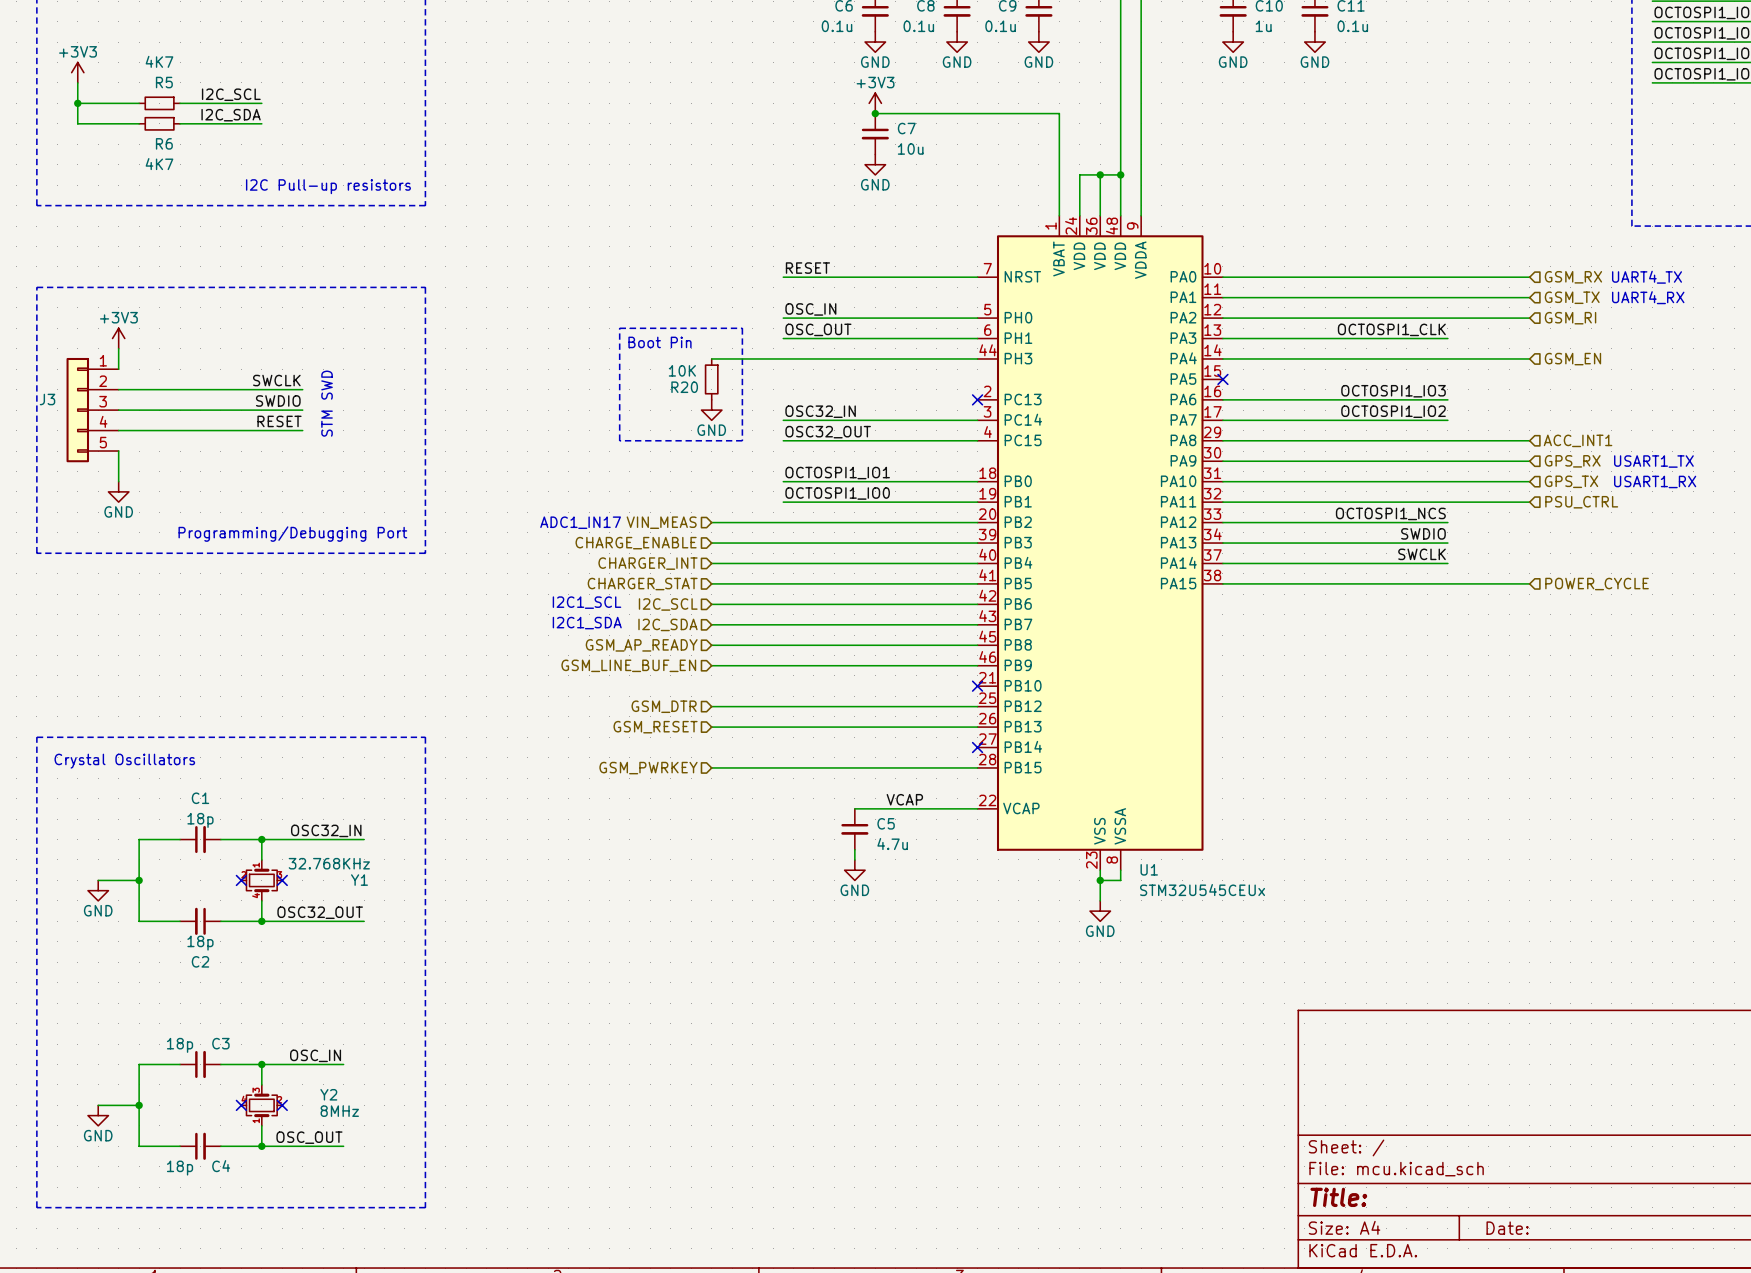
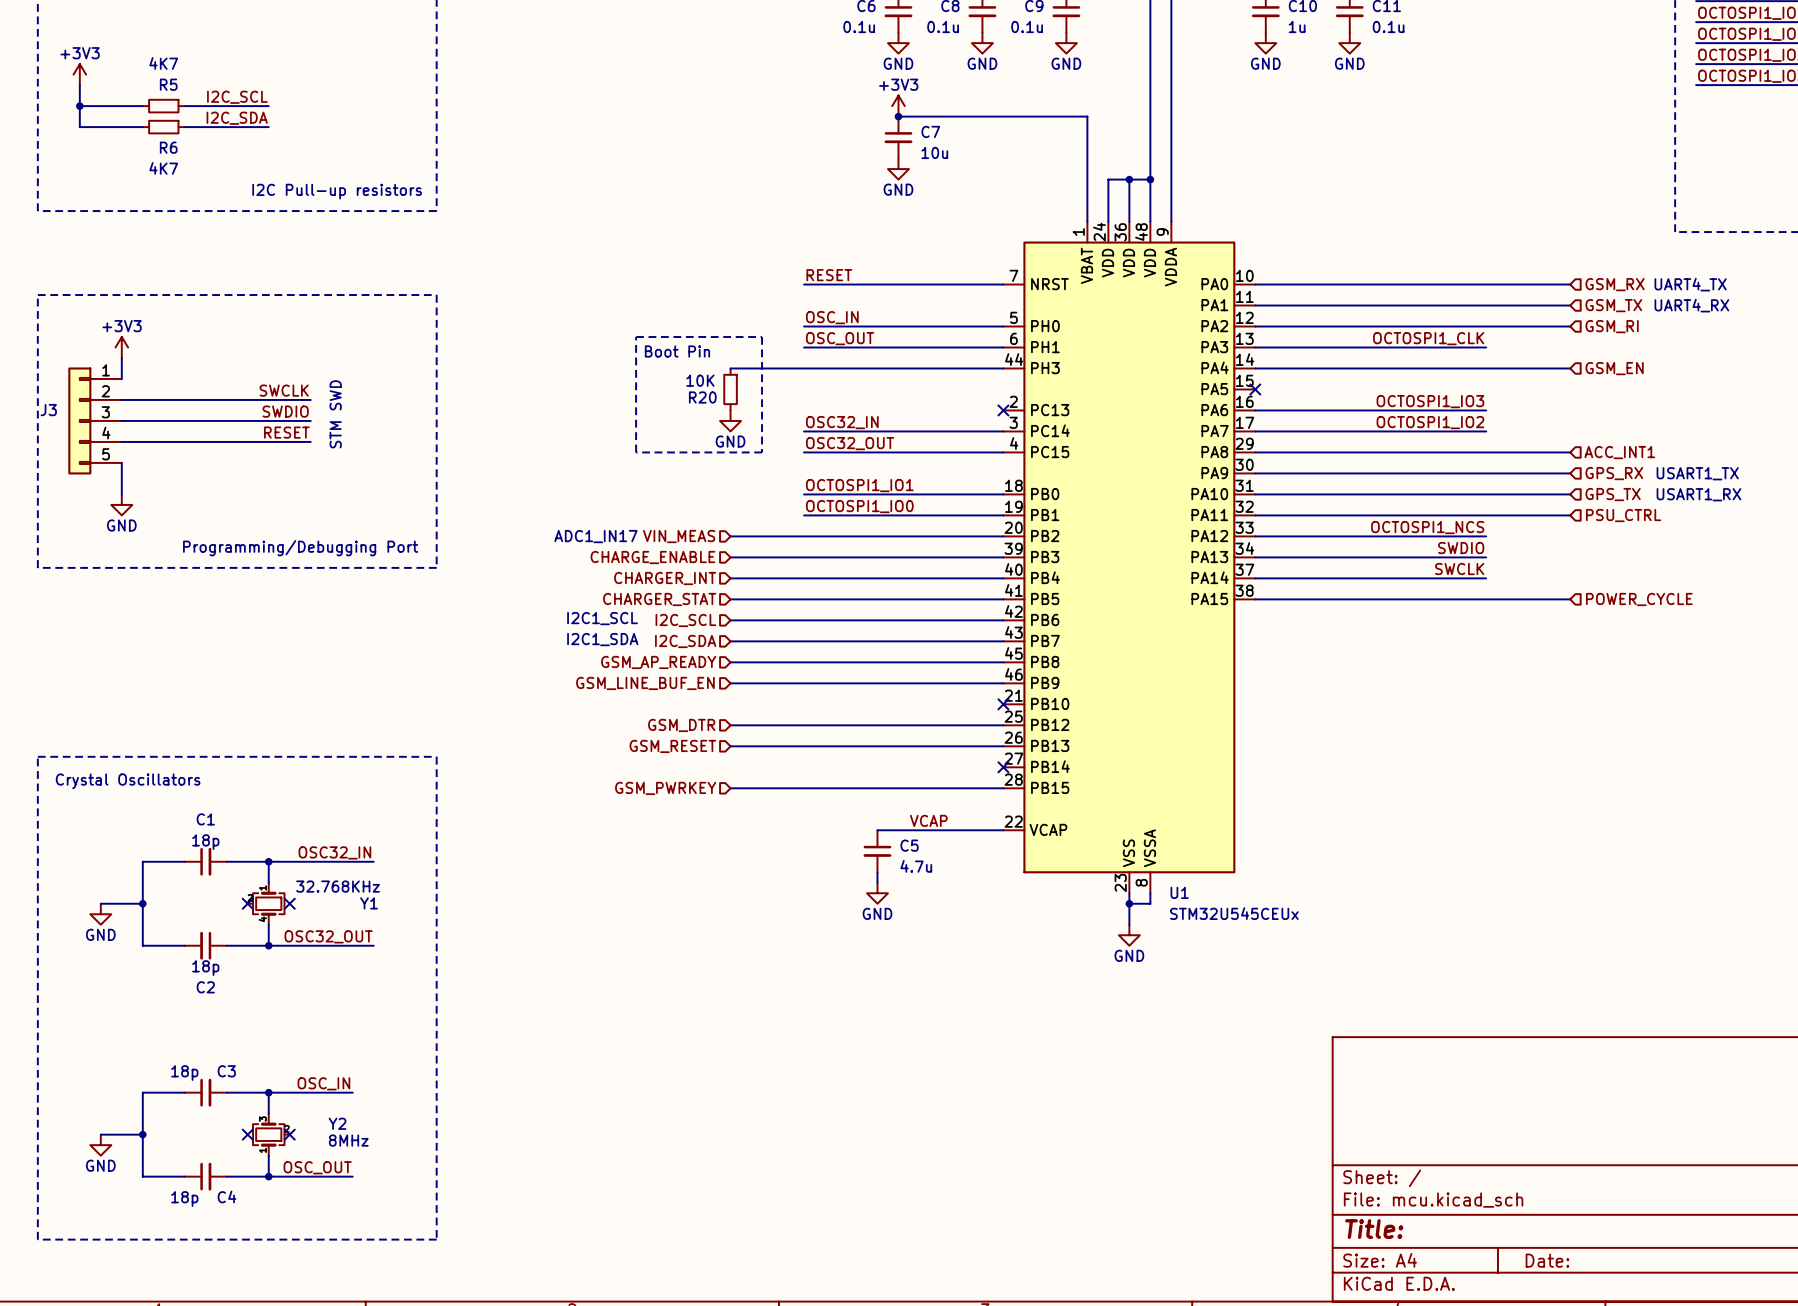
Y1 symbol: [241, 859, 283, 901] -> [247, 882, 285, 925]
Y2 symbol: [241, 1084, 283, 1126] -> [253, 1113, 290, 1156]

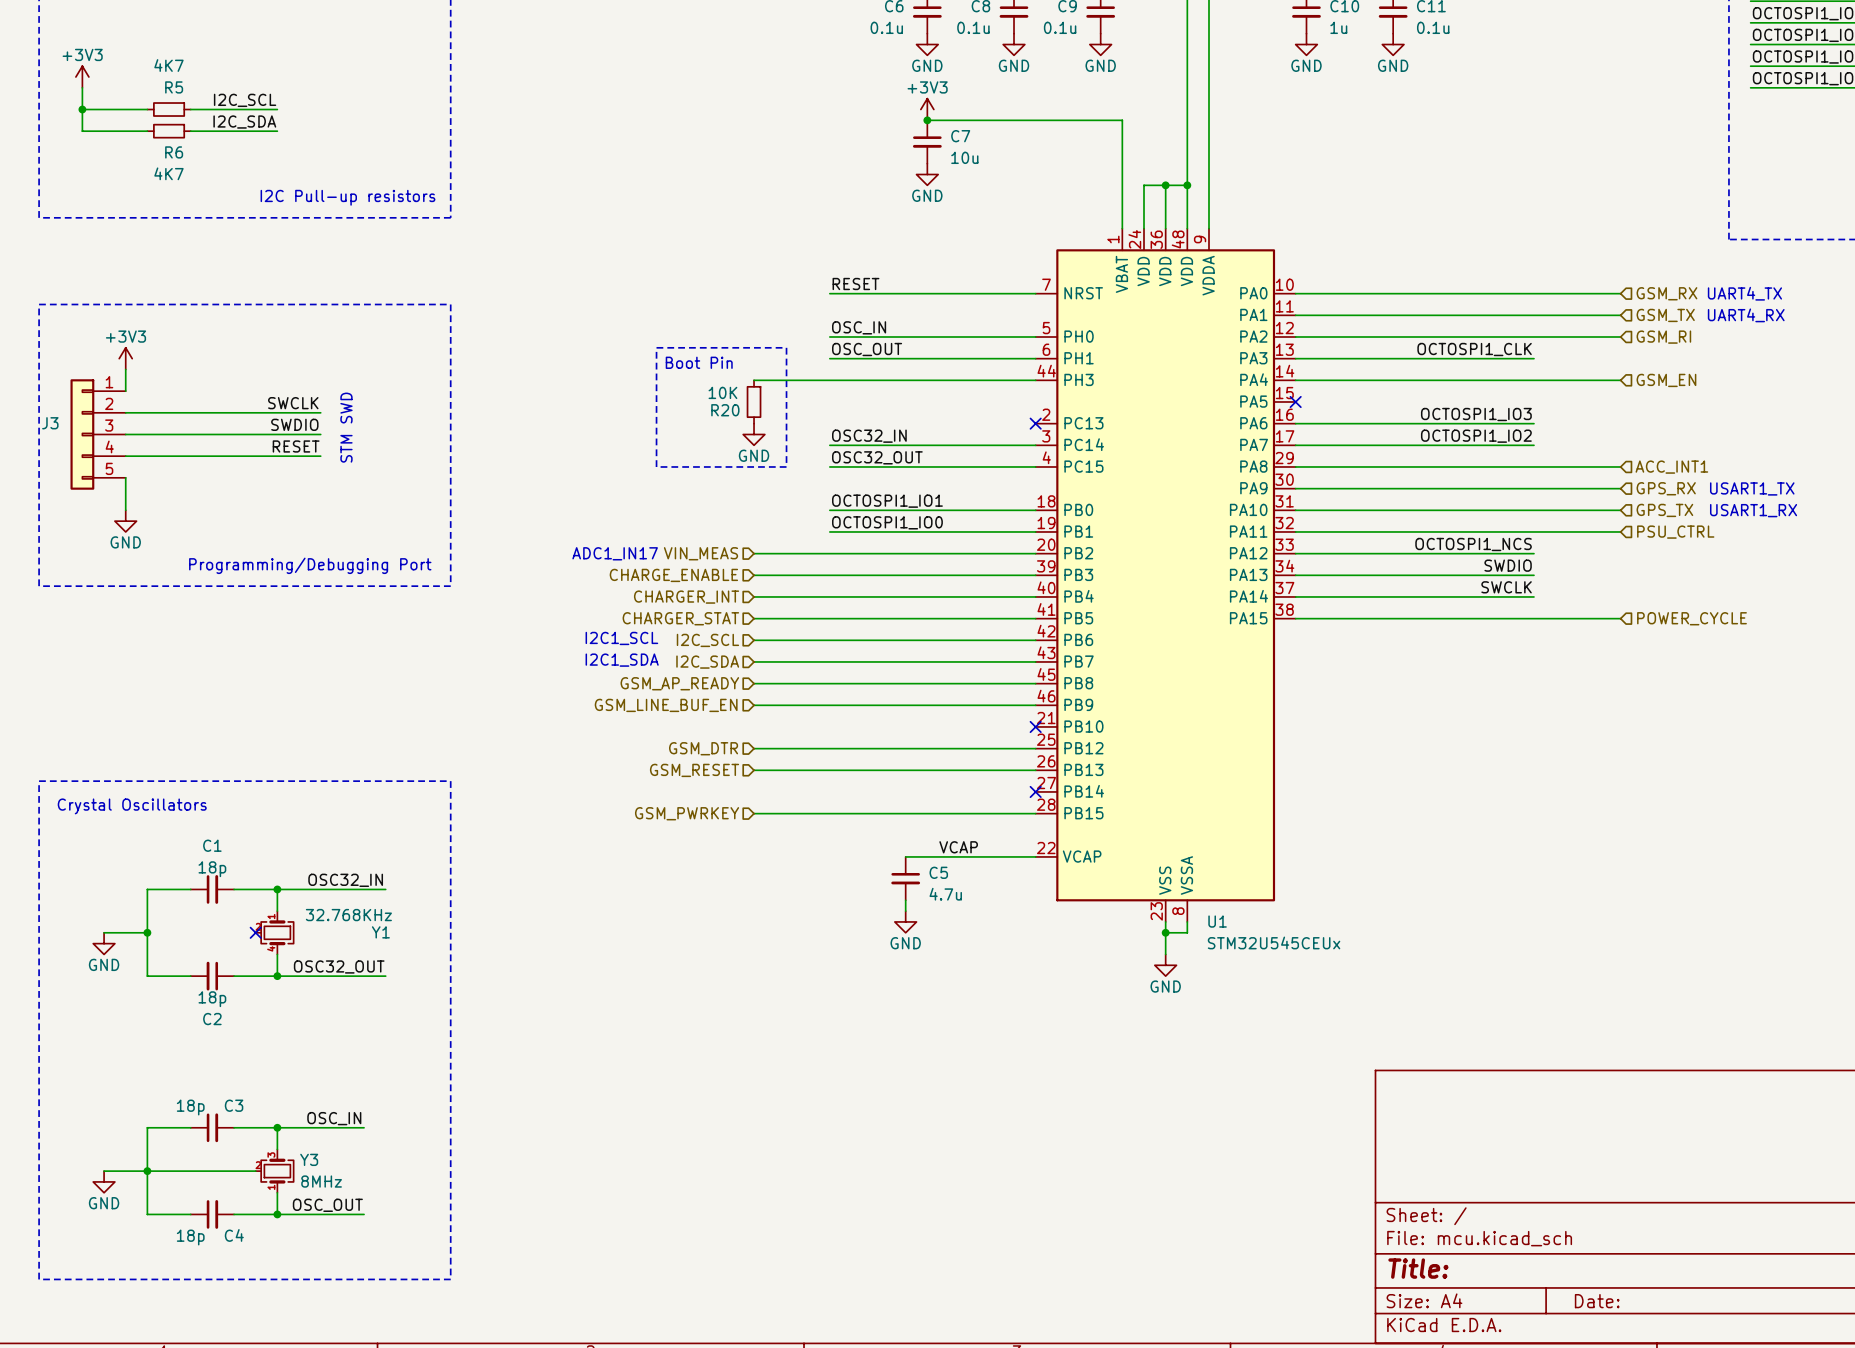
no-connect mark: (289, 903) -> none
wire: none -> (147, 1171) (255, 1171)
no-connect mark: (247, 1134) -> none
Y3: none -> 8MHz (274, 1171)
Y2: 8MHz (271, 1134) -> none
no-connect mark: (289, 1134) -> none

